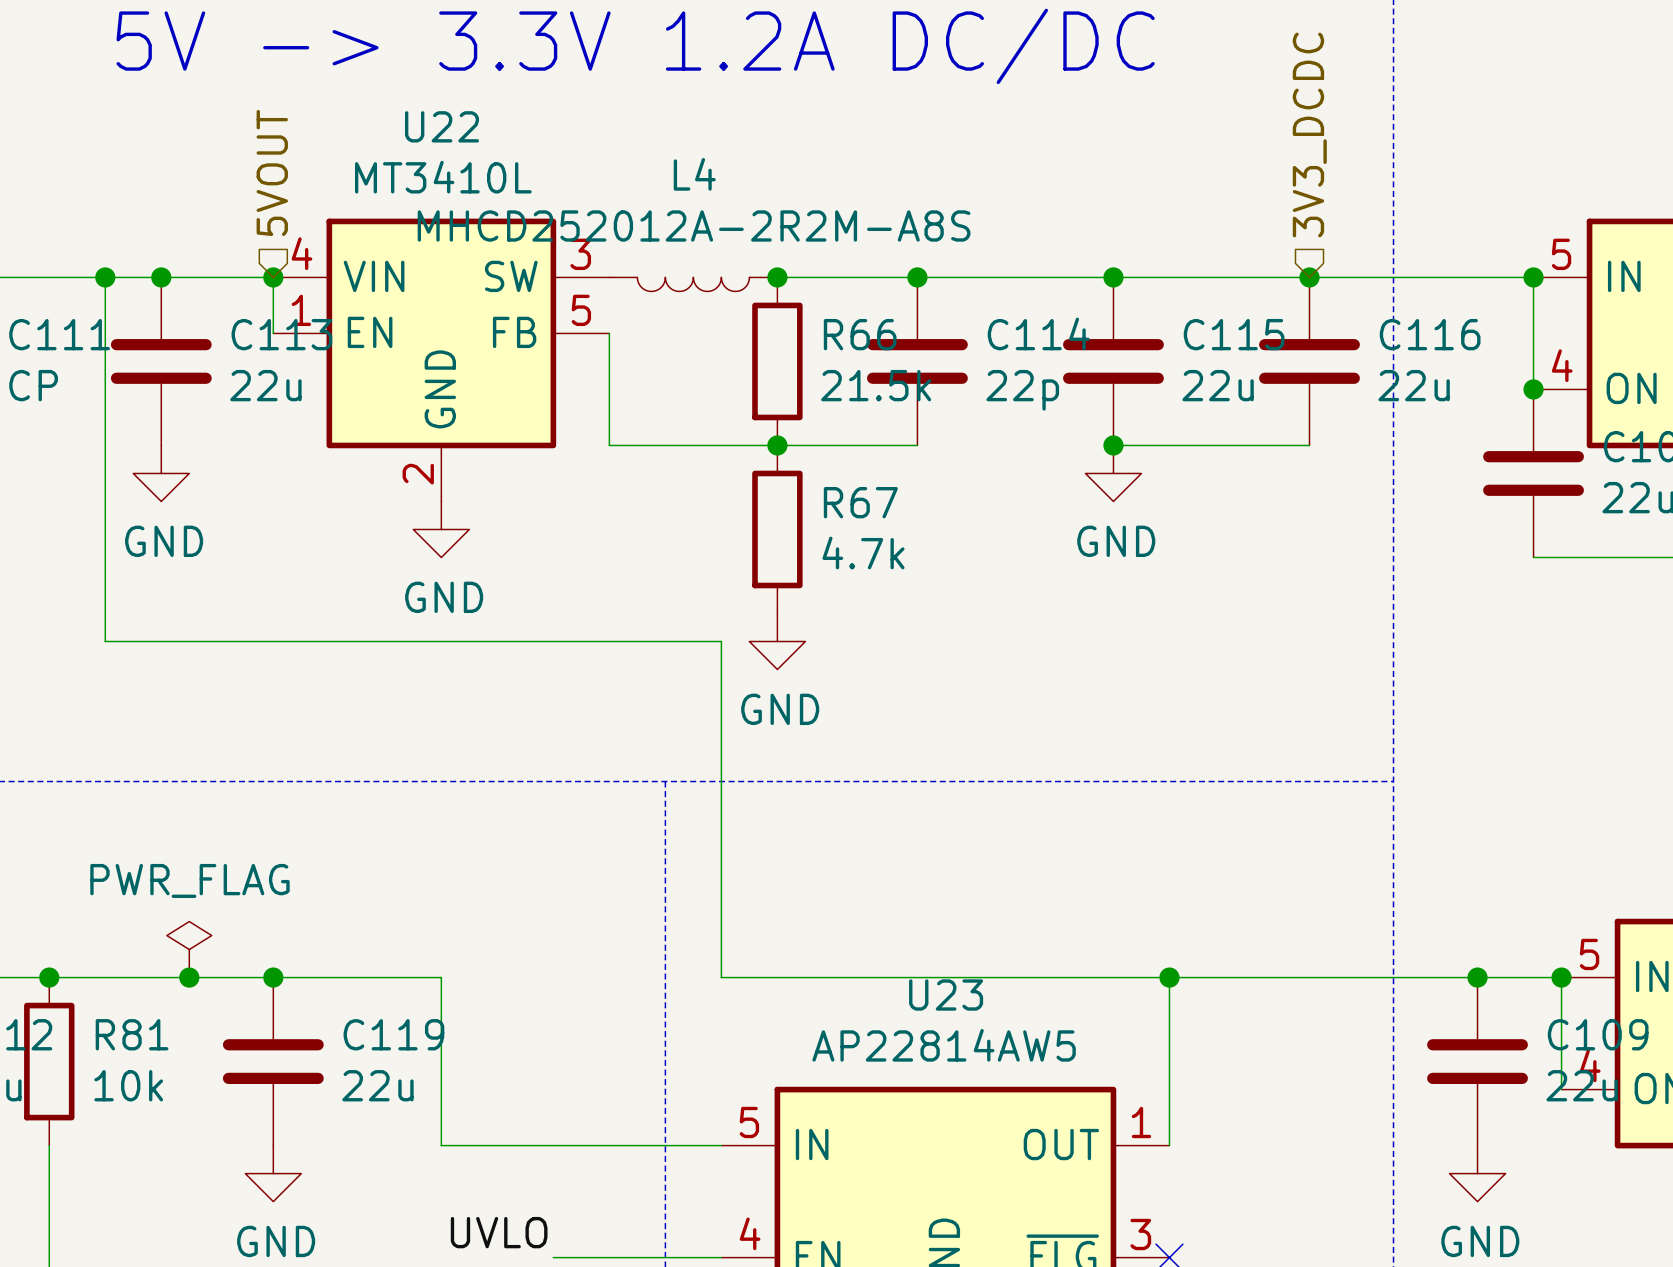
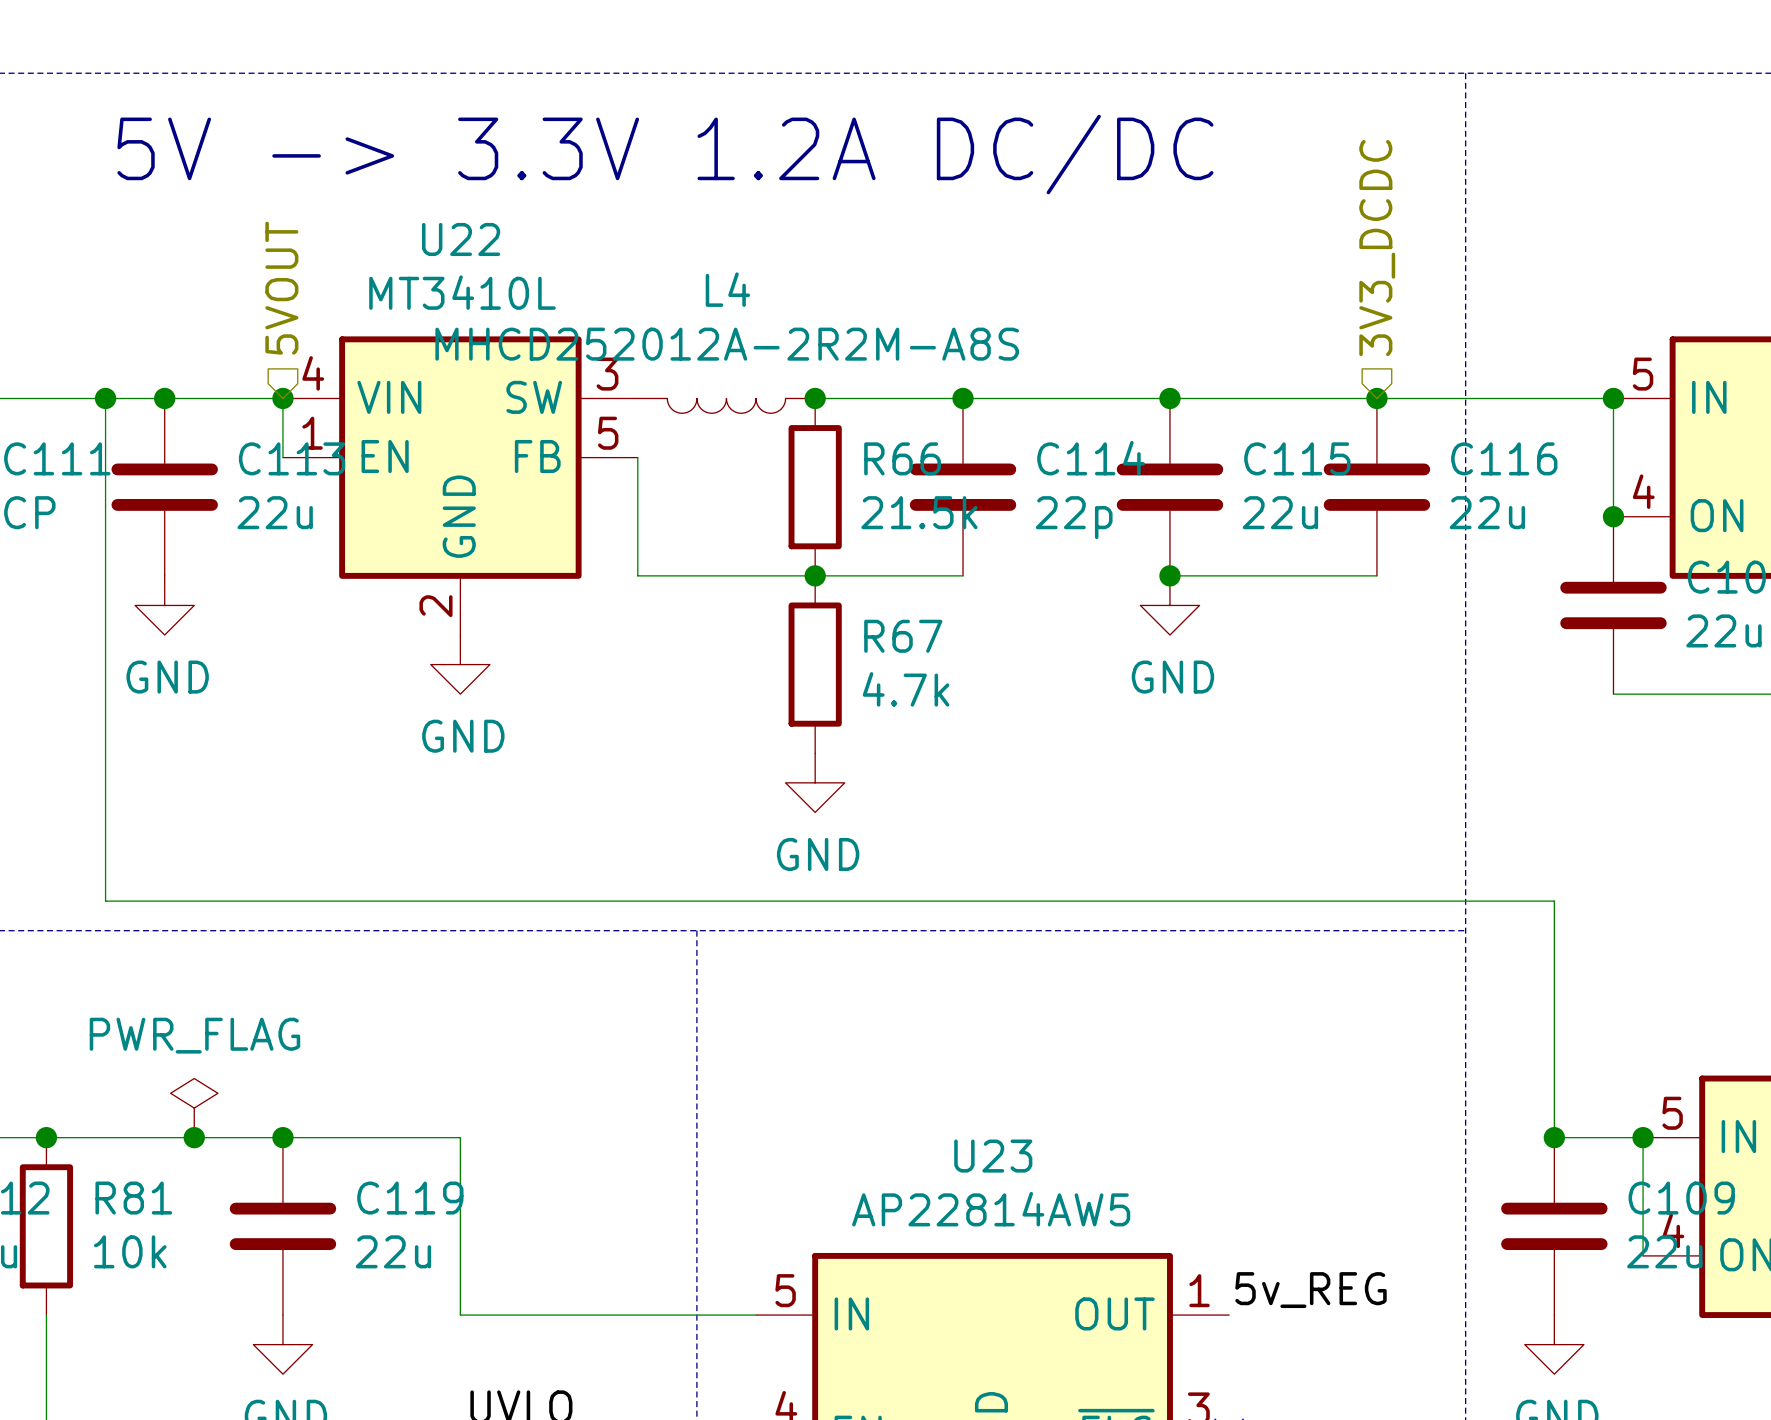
wire: (105, 641) (721, 641) (721, 977) (1477, 977) -> (105, 782) (105, 901) (1554, 901) (1554, 1137)
wire: (1169, 977) (1169, 1145) -> none
junction: (1169, 977) -> none
label: none -> 5v_REG (1310, 1290)

